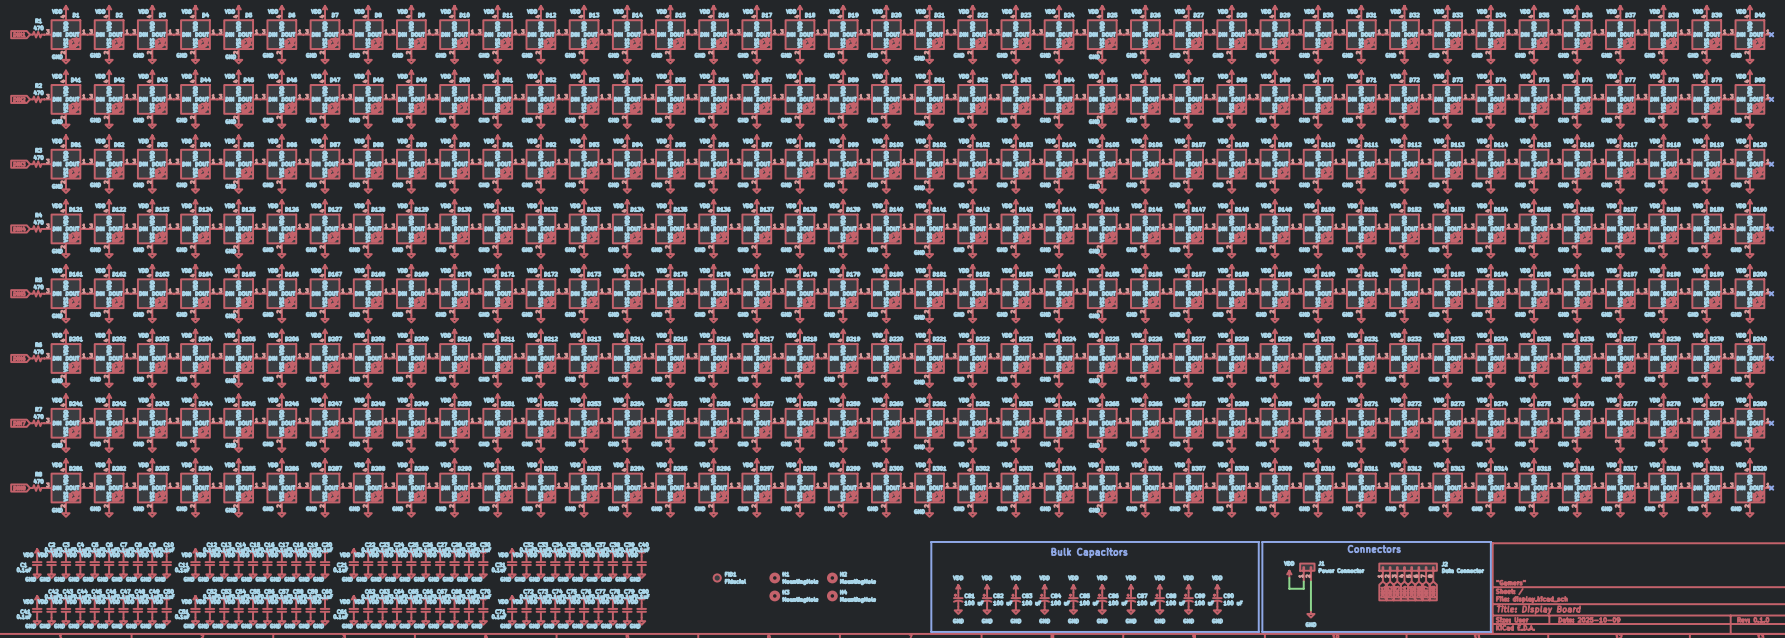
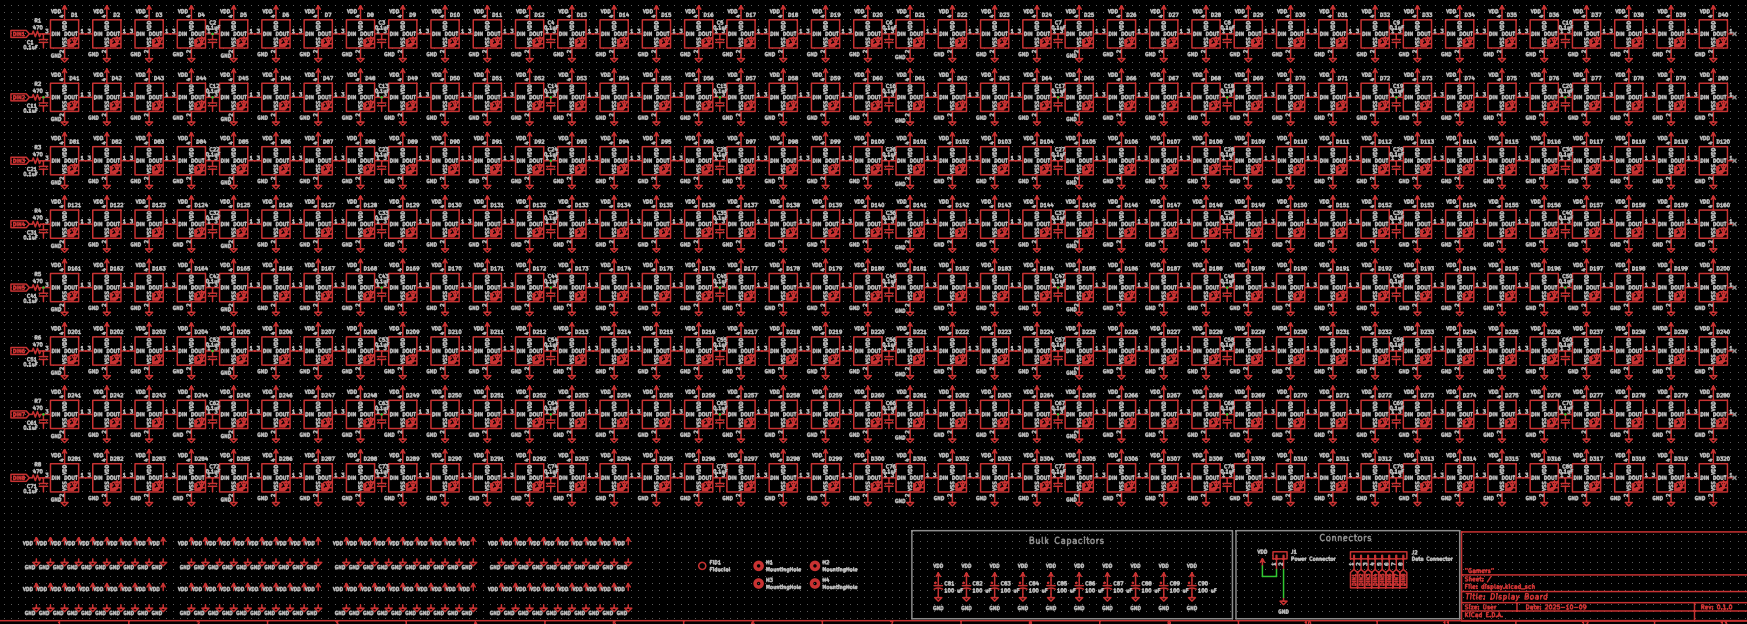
junction: none -> (212, 33)
junction: none -> (43, 97)
junction: none -> (212, 97)
junction: none -> (381, 97)
junction: none -> (550, 97)
junction: none -> (719, 97)
junction: none -> (1058, 97)
junction: none -> (1227, 97)
junction: none -> (1396, 97)
junction: none -> (1565, 97)
junction: none -> (550, 160)
junction: none -> (43, 287)
junction: none -> (381, 287)
junction: none -> (550, 287)
junction: none -> (719, 287)
junction: none -> (1058, 287)
junction: none -> (1227, 287)
junction: none -> (1565, 287)
junction: none -> (212, 350)
junction: none -> (43, 414)
junction: none -> (381, 414)
junction: none -> (550, 414)
junction: none -> (719, 414)
junction: none -> (1058, 414)
junction: none -> (1227, 414)
junction: none -> (1565, 414)
part position: (37, 563) -> (43, 40)
part position: (51, 563) -> (212, 40)
part position: (65, 563) -> (381, 40)
part position: (80, 563) -> (550, 40)
part position: (94, 563) -> (719, 40)
part position: (109, 563) -> (888, 40)
part position: (123, 563) -> (1058, 40)
part position: (137, 563) -> (1227, 40)
part position: (152, 563) -> (1396, 40)
part position: (166, 563) -> (1565, 40)
part position: (195, 563) -> (43, 104)
part position: (209, 563) -> (212, 104)
part position: (224, 563) -> (381, 104)
part position: (238, 563) -> (550, 104)
part position: (253, 563) -> (719, 104)
part position: (267, 563) -> (888, 104)
part position: (281, 563) -> (1058, 104)
part position: (296, 563) -> (1227, 104)
part position: (310, 563) -> (1396, 104)
part position: (325, 563) -> (1565, 104)
part position: (353, 563) -> (43, 167)
part position: (368, 563) -> (212, 167)
part position: (382, 563) -> (381, 167)
part position: (396, 563) -> (550, 167)
part position: (411, 563) -> (719, 167)
part position: (425, 563) -> (888, 167)
part position: (440, 563) -> (1058, 167)
part position: (454, 563) -> (1227, 167)
part position: (468, 563) -> (1396, 167)
part position: (483, 563) -> (1565, 167)
part position: (512, 563) -> (43, 231)
part position: (526, 563) -> (212, 231)
part position: (540, 563) -> (381, 231)
part position: (555, 563) -> (550, 231)
part position: (569, 563) -> (719, 231)
part position: (584, 563) -> (888, 231)
part position: (598, 563) -> (1058, 231)
part position: (612, 563) -> (1227, 231)
part position: (627, 563) -> (1396, 231)
part position: (641, 563) -> (1565, 231)
part position: (37, 610) -> (43, 294)
part position: (51, 610) -> (212, 294)
part position: (65, 610) -> (381, 294)
part position: (80, 610) -> (550, 294)
part position: (94, 610) -> (719, 294)
part position: (109, 610) -> (888, 294)
part position: (123, 610) -> (1058, 294)
part position: (137, 610) -> (1227, 294)
part position: (152, 610) -> (1396, 294)
part position: (166, 610) -> (1565, 294)
part position: (195, 610) -> (43, 358)
part position: (209, 610) -> (212, 358)
part position: (224, 610) -> (381, 358)
part position: (238, 610) -> (550, 358)
part position: (253, 610) -> (719, 358)
part position: (267, 610) -> (888, 358)
part position: (281, 610) -> (1058, 358)
part position: (296, 610) -> (1227, 358)
part position: (310, 610) -> (1396, 358)
part position: (325, 610) -> (1565, 358)
part position: (353, 610) -> (43, 421)
part position: (368, 610) -> (212, 421)
part position: (382, 610) -> (381, 421)
part position: (396, 610) -> (550, 421)
part position: (411, 610) -> (719, 421)
part position: (425, 610) -> (888, 421)
part position: (440, 610) -> (1058, 421)
part position: (454, 610) -> (1227, 421)
part position: (468, 610) -> (1396, 421)
part position: (483, 610) -> (1565, 421)
part position: (512, 610) -> (43, 484)
part position: (526, 610) -> (212, 484)
part position: (540, 610) -> (381, 484)
part position: (555, 610) -> (550, 484)
part position: (569, 610) -> (719, 484)
part position: (584, 610) -> (888, 484)
part position: (598, 610) -> (1058, 484)
part position: (612, 610) -> (1227, 484)
part position: (627, 610) -> (1396, 484)
part position: (641, 610) -> (1565, 484)

